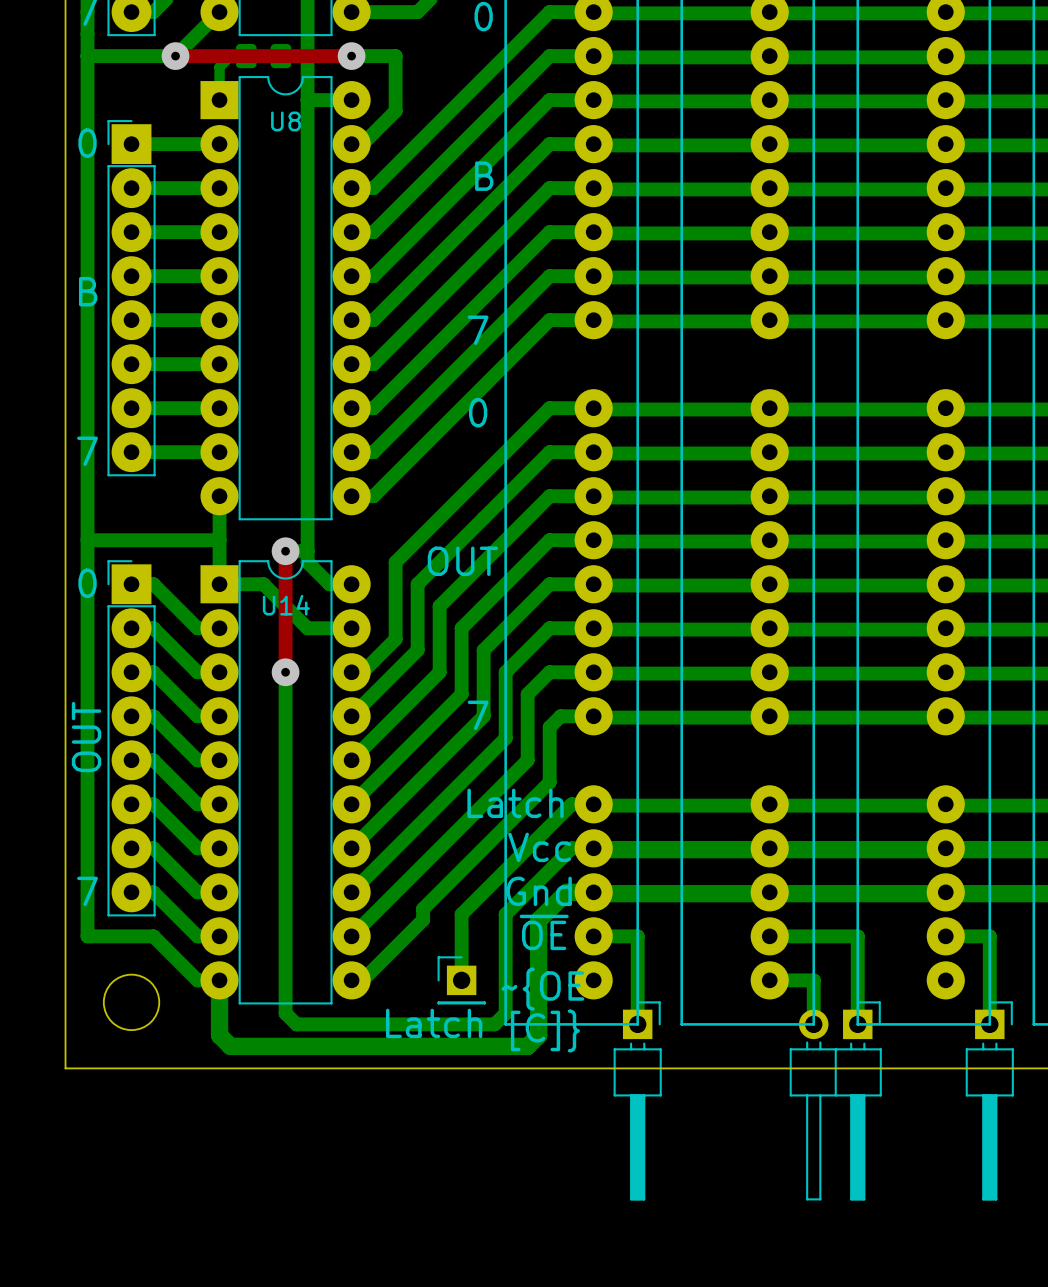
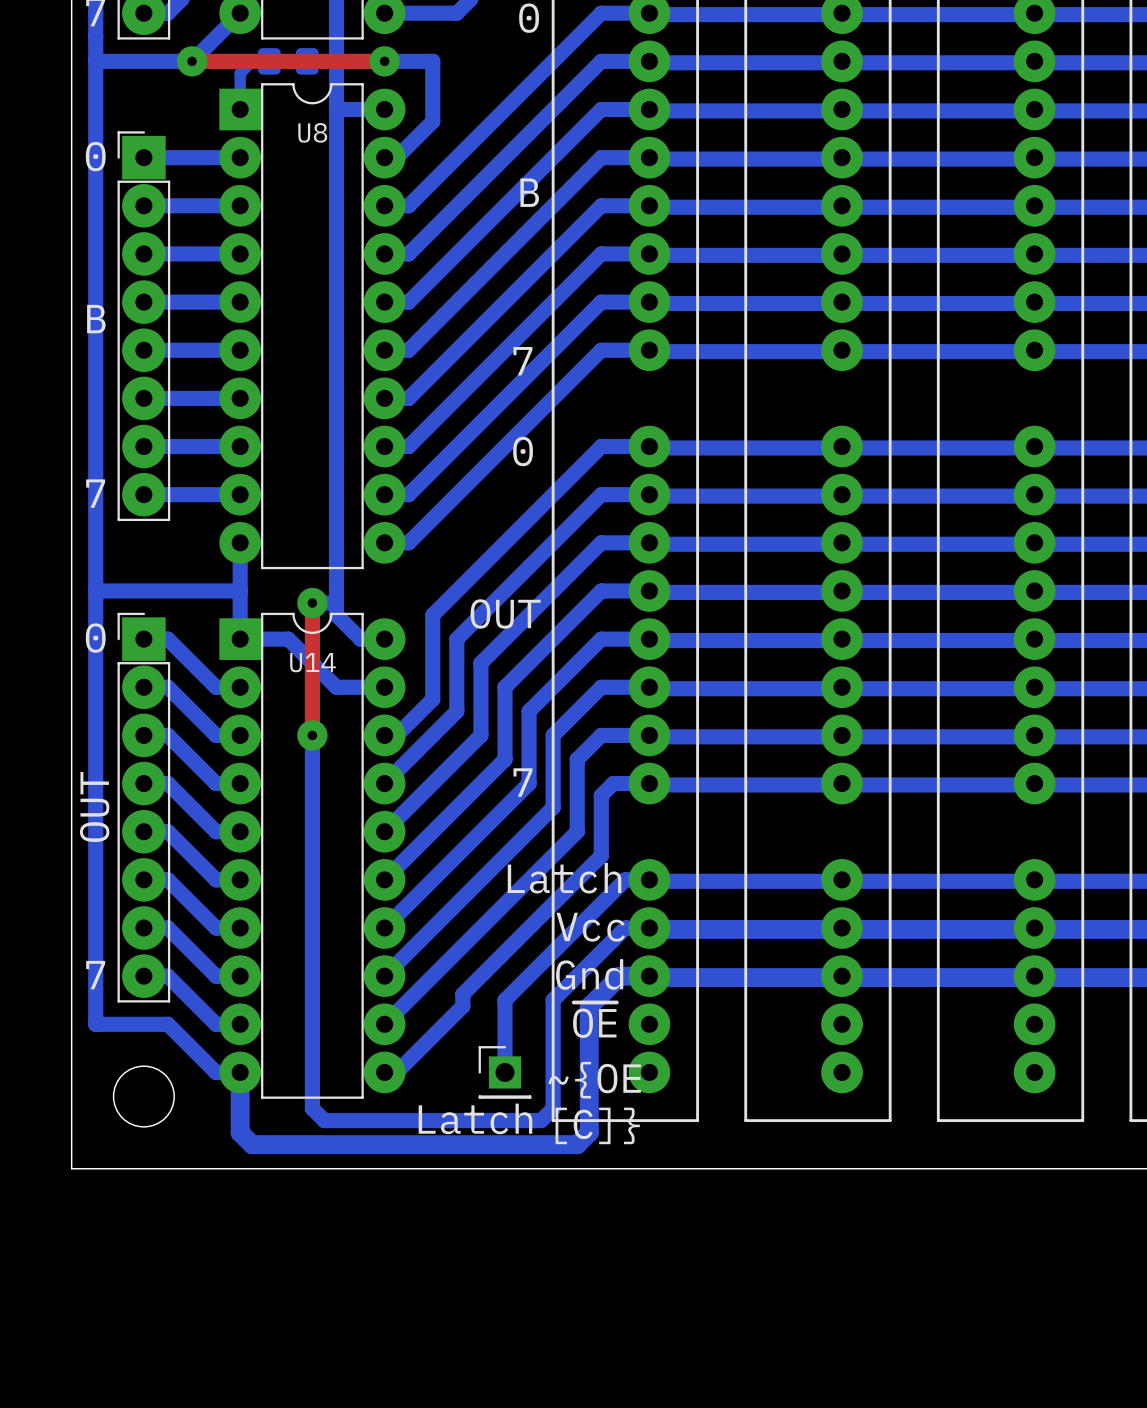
bottom track: (593, 936) (637, 936) (637, 1024) -> none
bottom track: (769, 936) (857, 936) (857, 1024) -> none
bottom track: (945, 936) (989, 936) (989, 1024) -> none
bottom track: (769, 980) (813, 980) (813, 1024) -> none
part: (637, 1100) -> none
part: (835, 1100) -> none
part: (989, 1100) -> none

